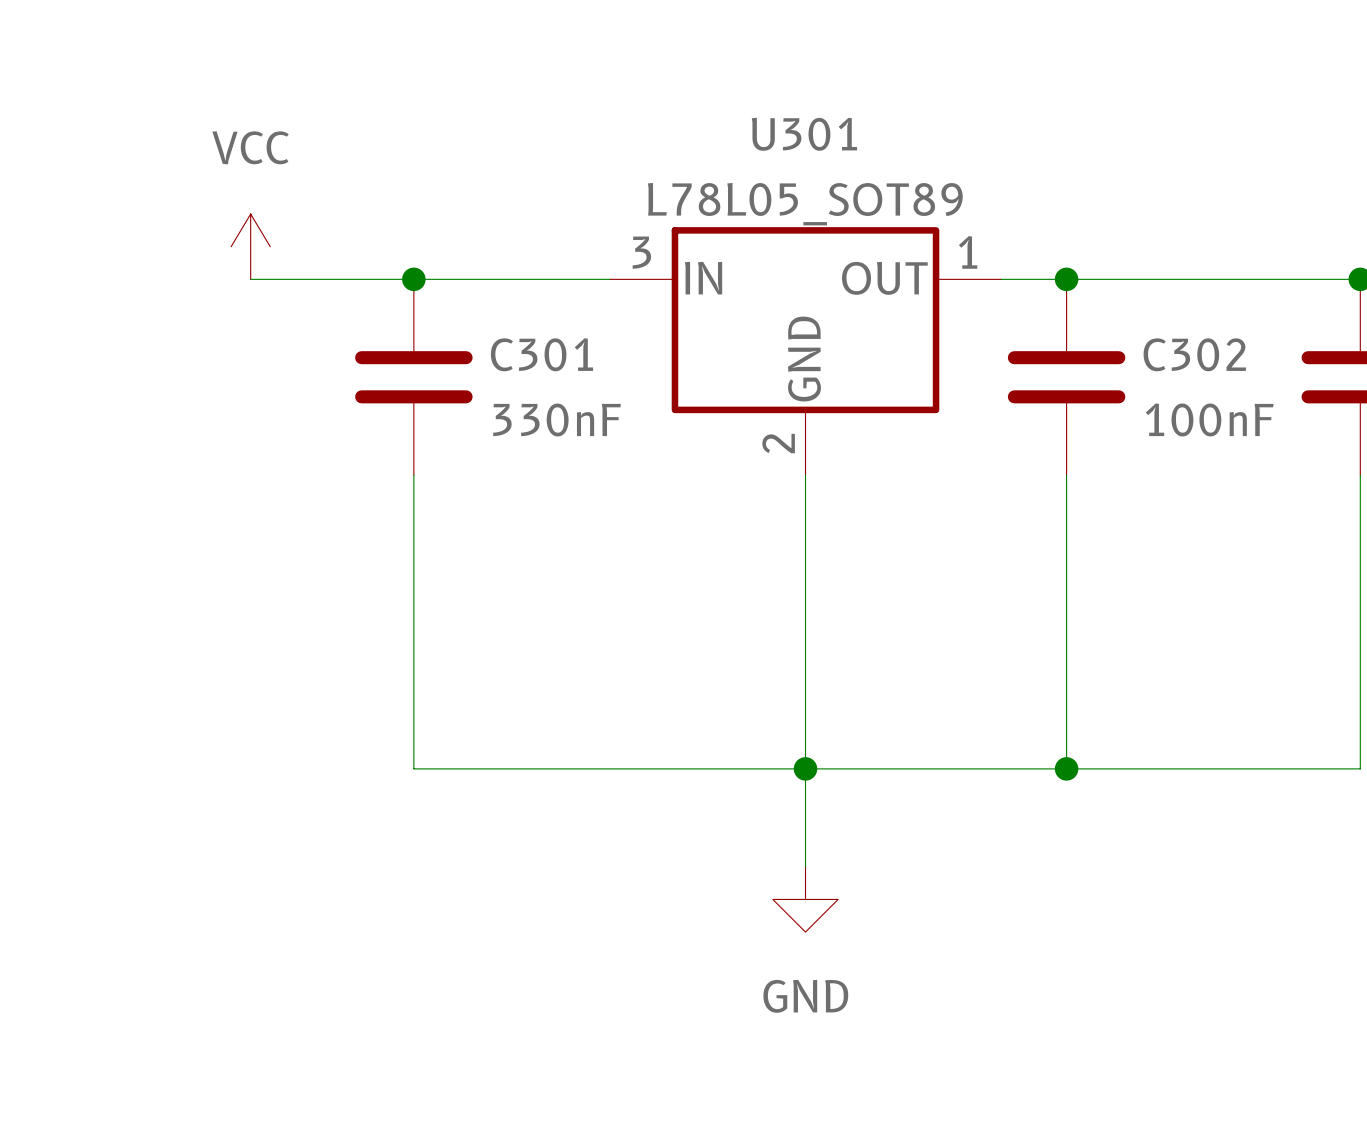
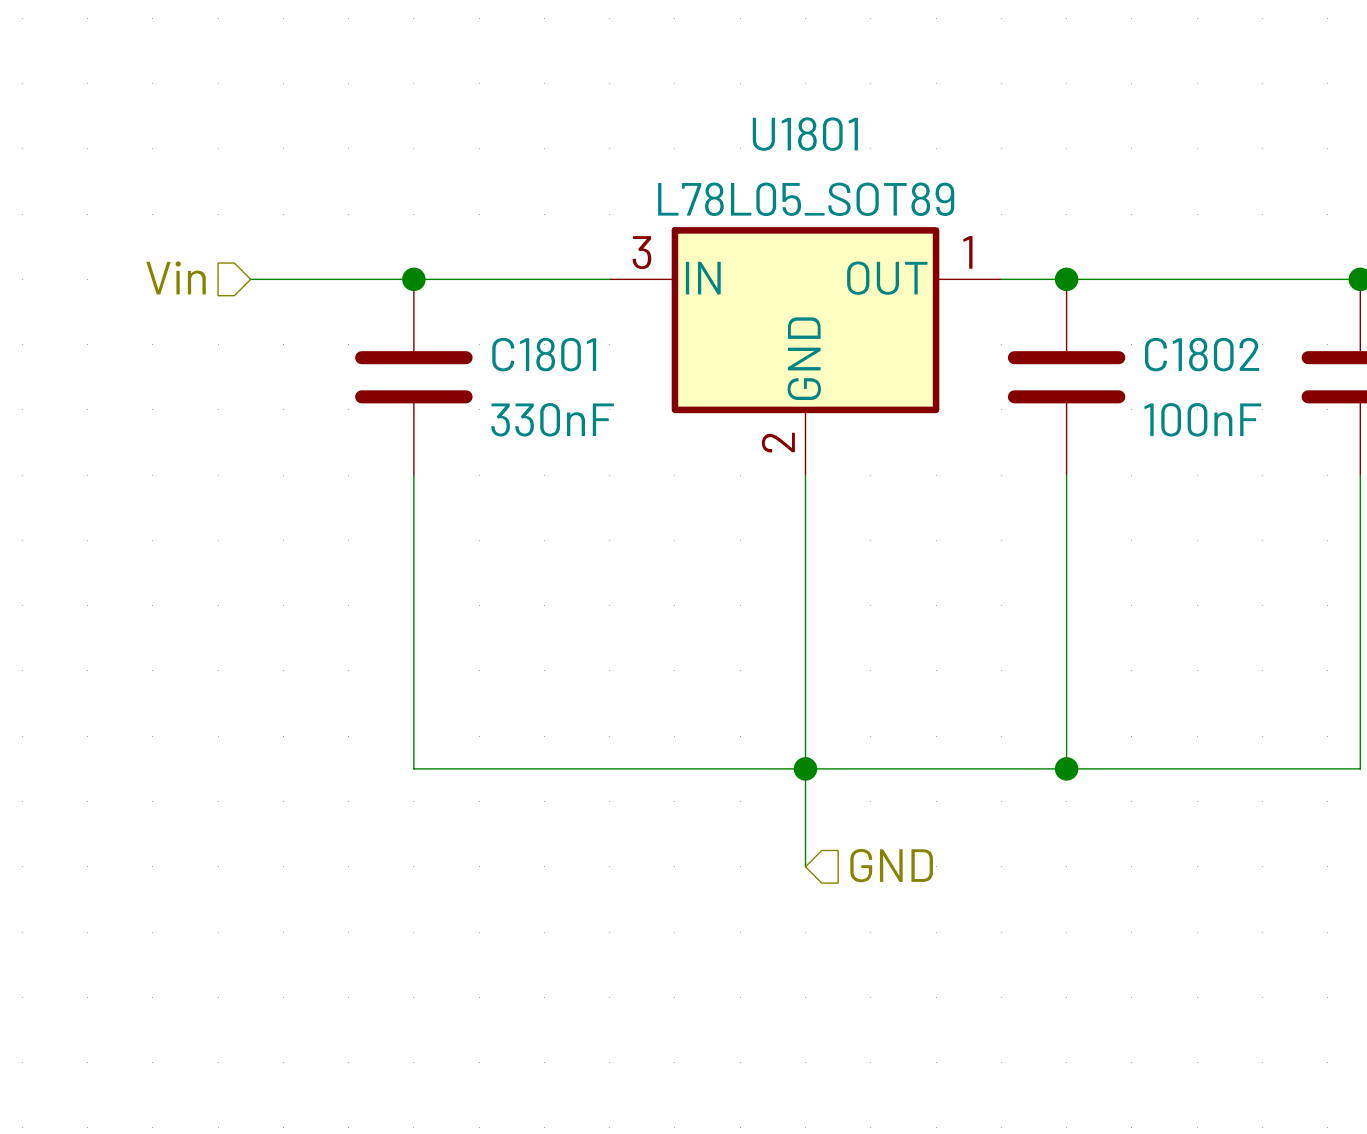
U301 name: U301 (804, 134) -> U1801 (805, 134)
power symbol: VCC (250, 246) -> none
hierarchical label: none -> Vin (176, 277)
C301 name: C301 (541, 354) -> C1801 (544, 354)
C302 name: C302 (1194, 354) -> C1802 (1202, 354)
hierarchical label: none -> GND (891, 865)
power symbol: GND (805, 899) -> none

